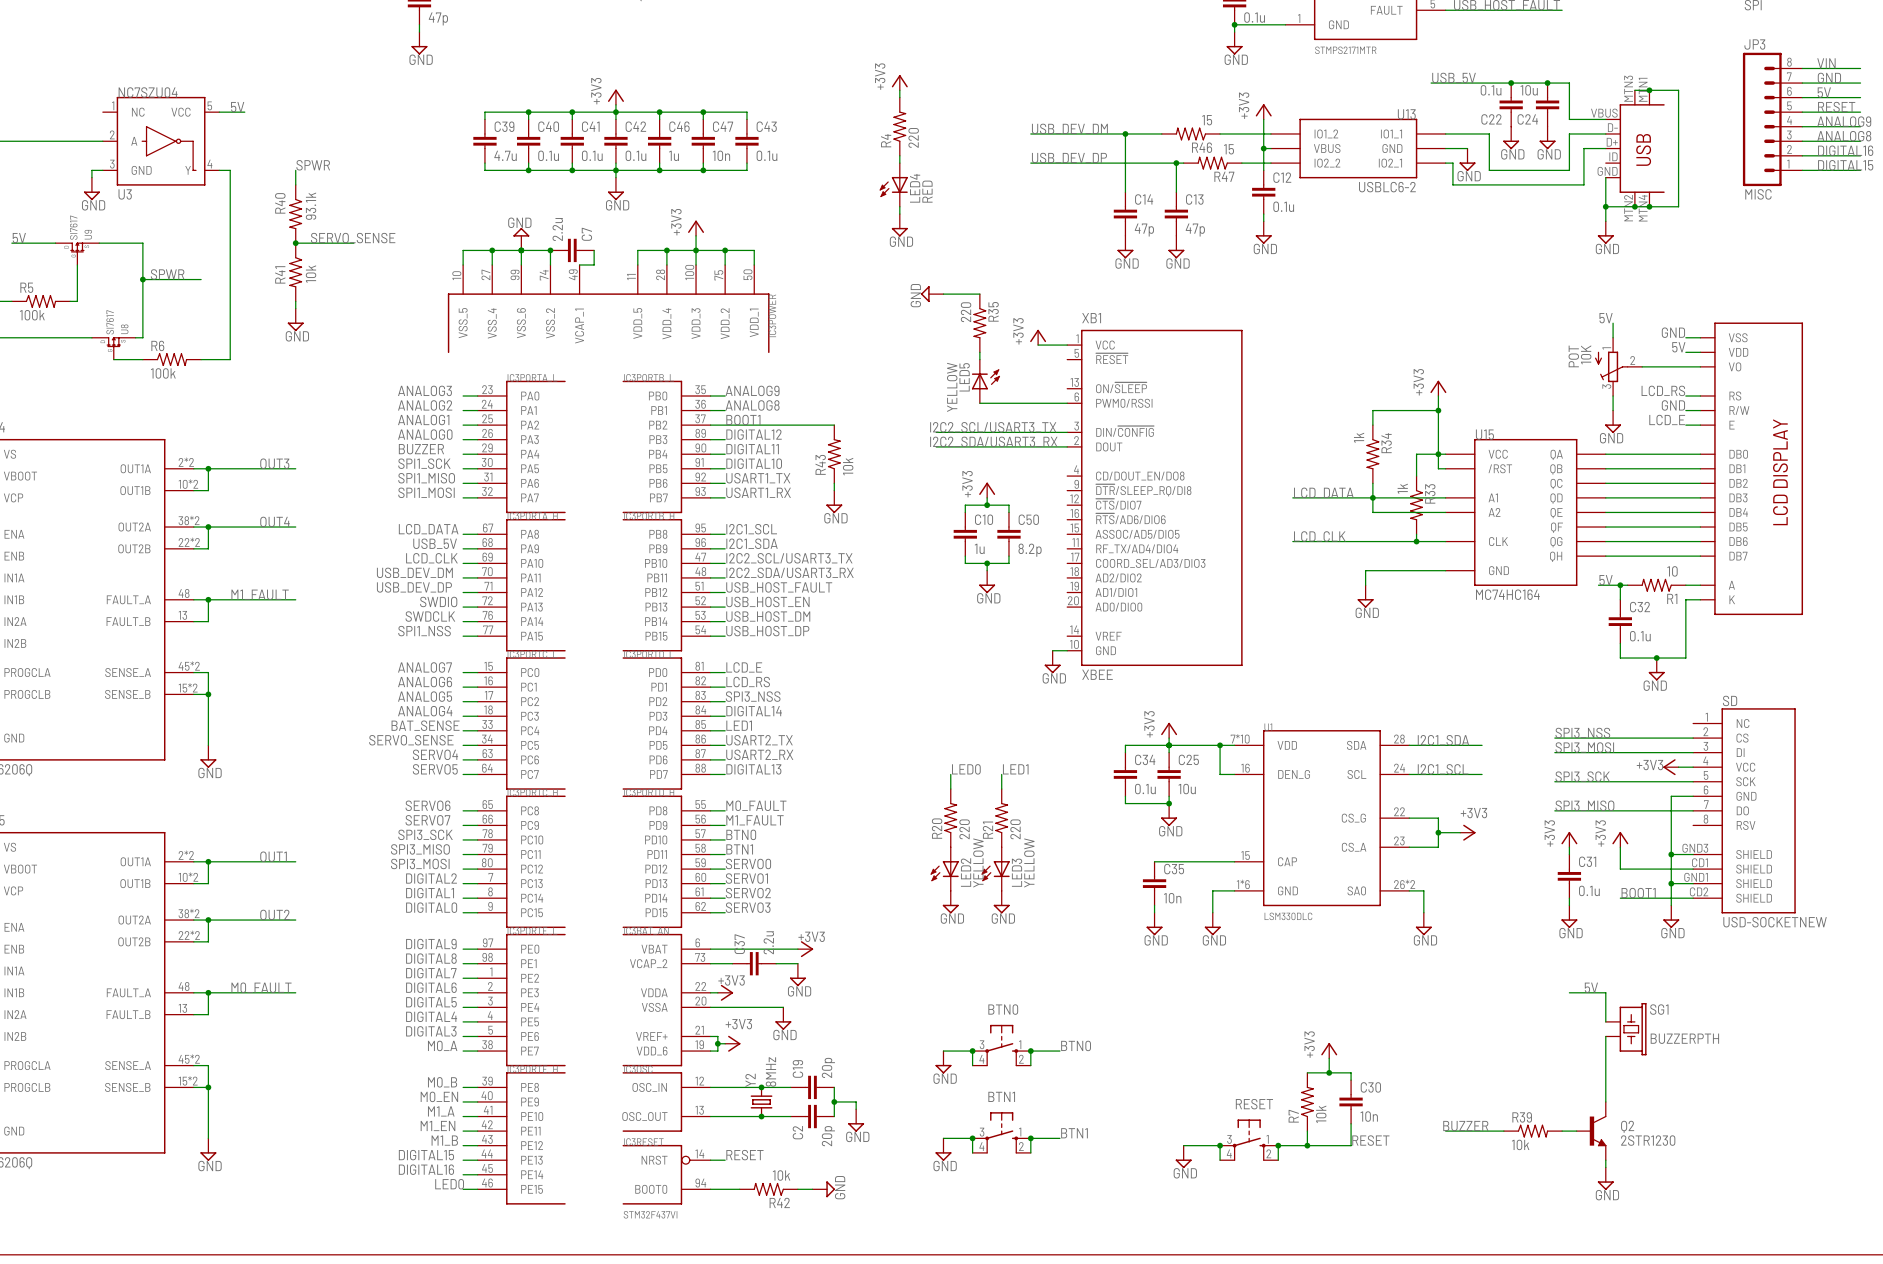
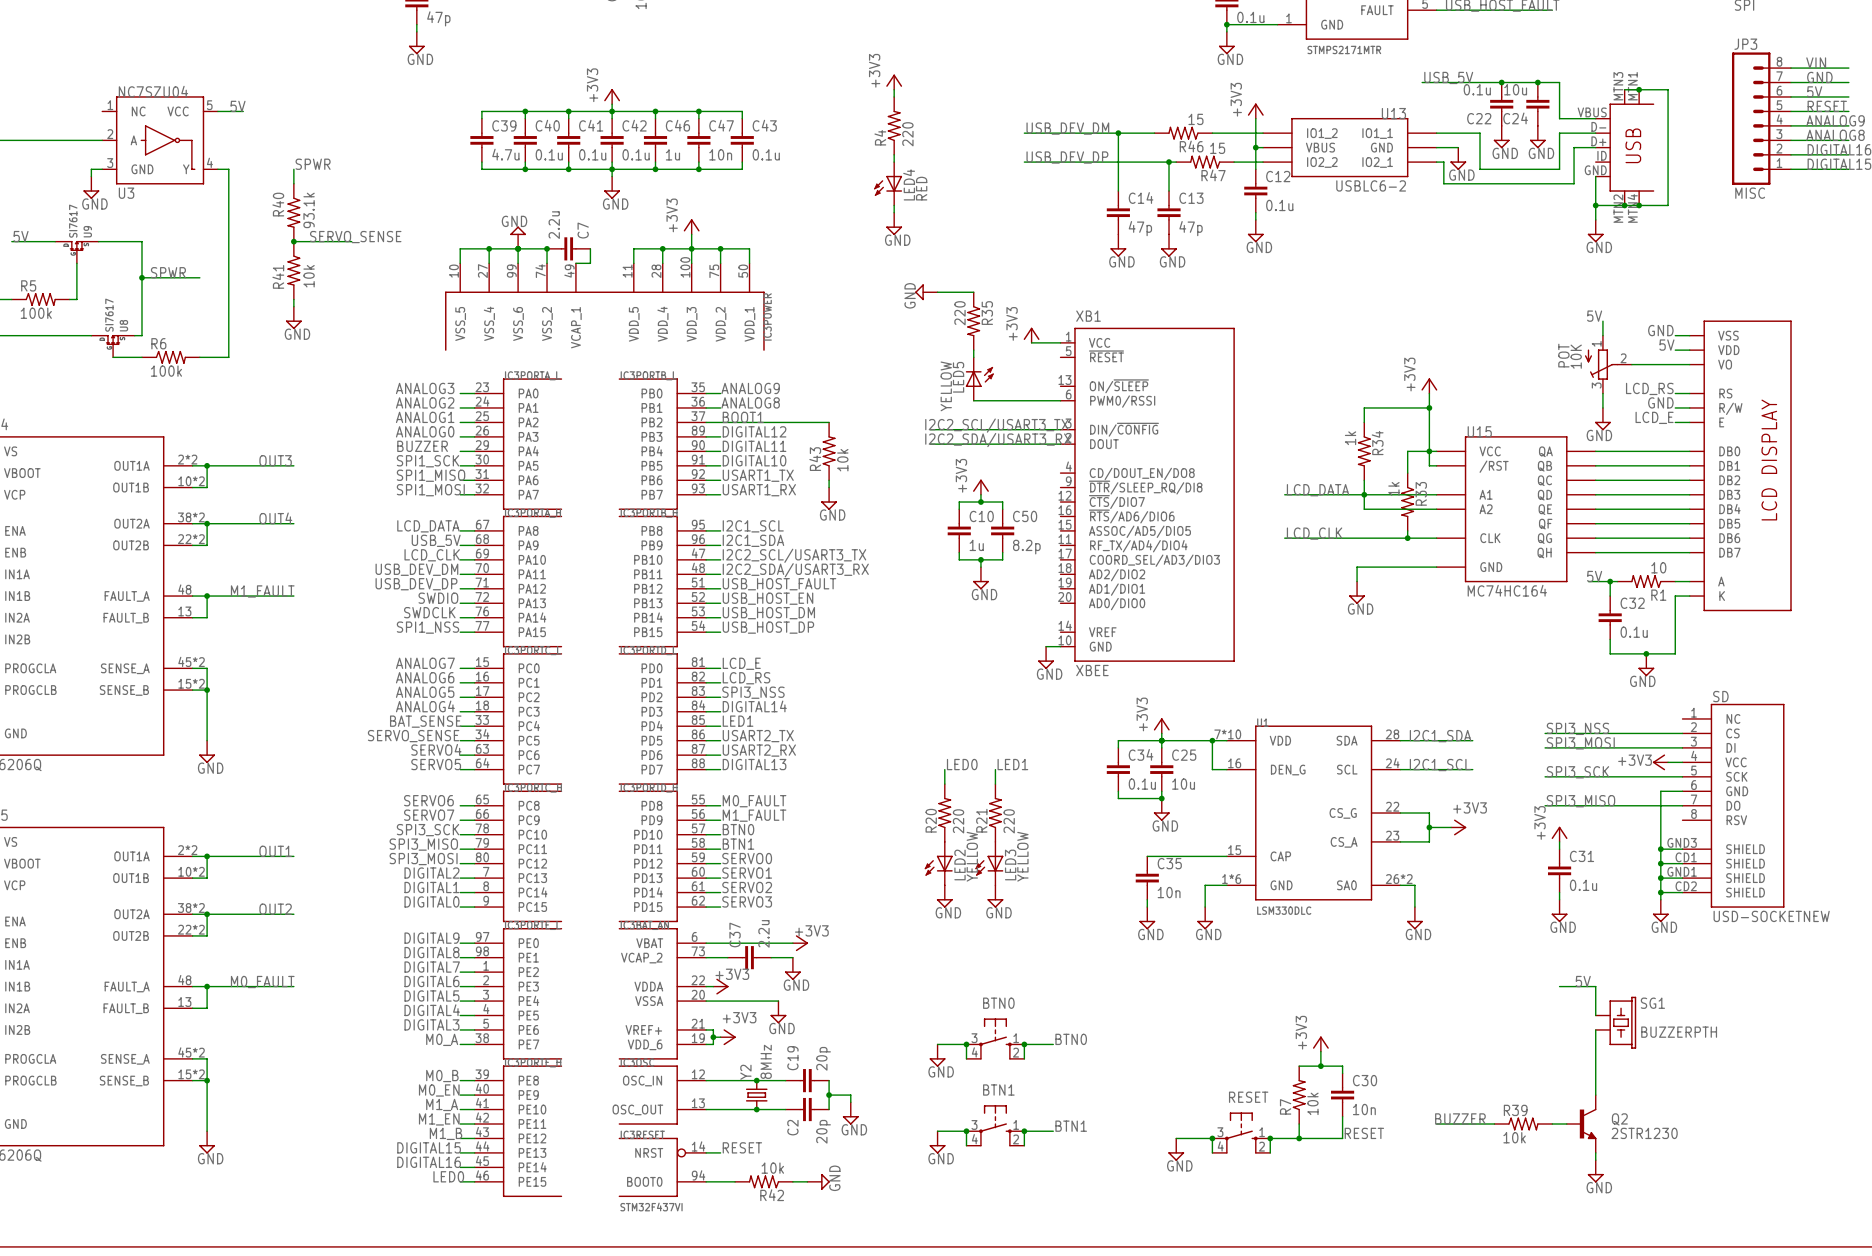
power symbol: +3V3 (1620, 839) -> none
wire: (1620, 847) (1620, 869) (1671, 869) -> none
junction: none -> (1660, 863)
label: BOOT1 (1638, 893) -> none
wire: (1620, 898) (1671, 898) -> none
junction: none -> (1660, 892)

